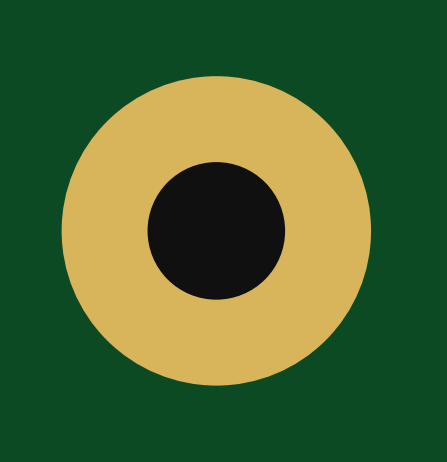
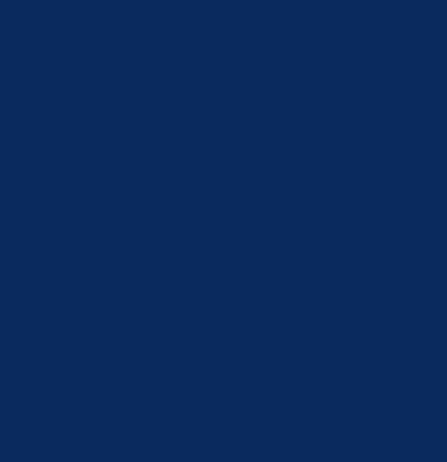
part: (216, 230) -> none

